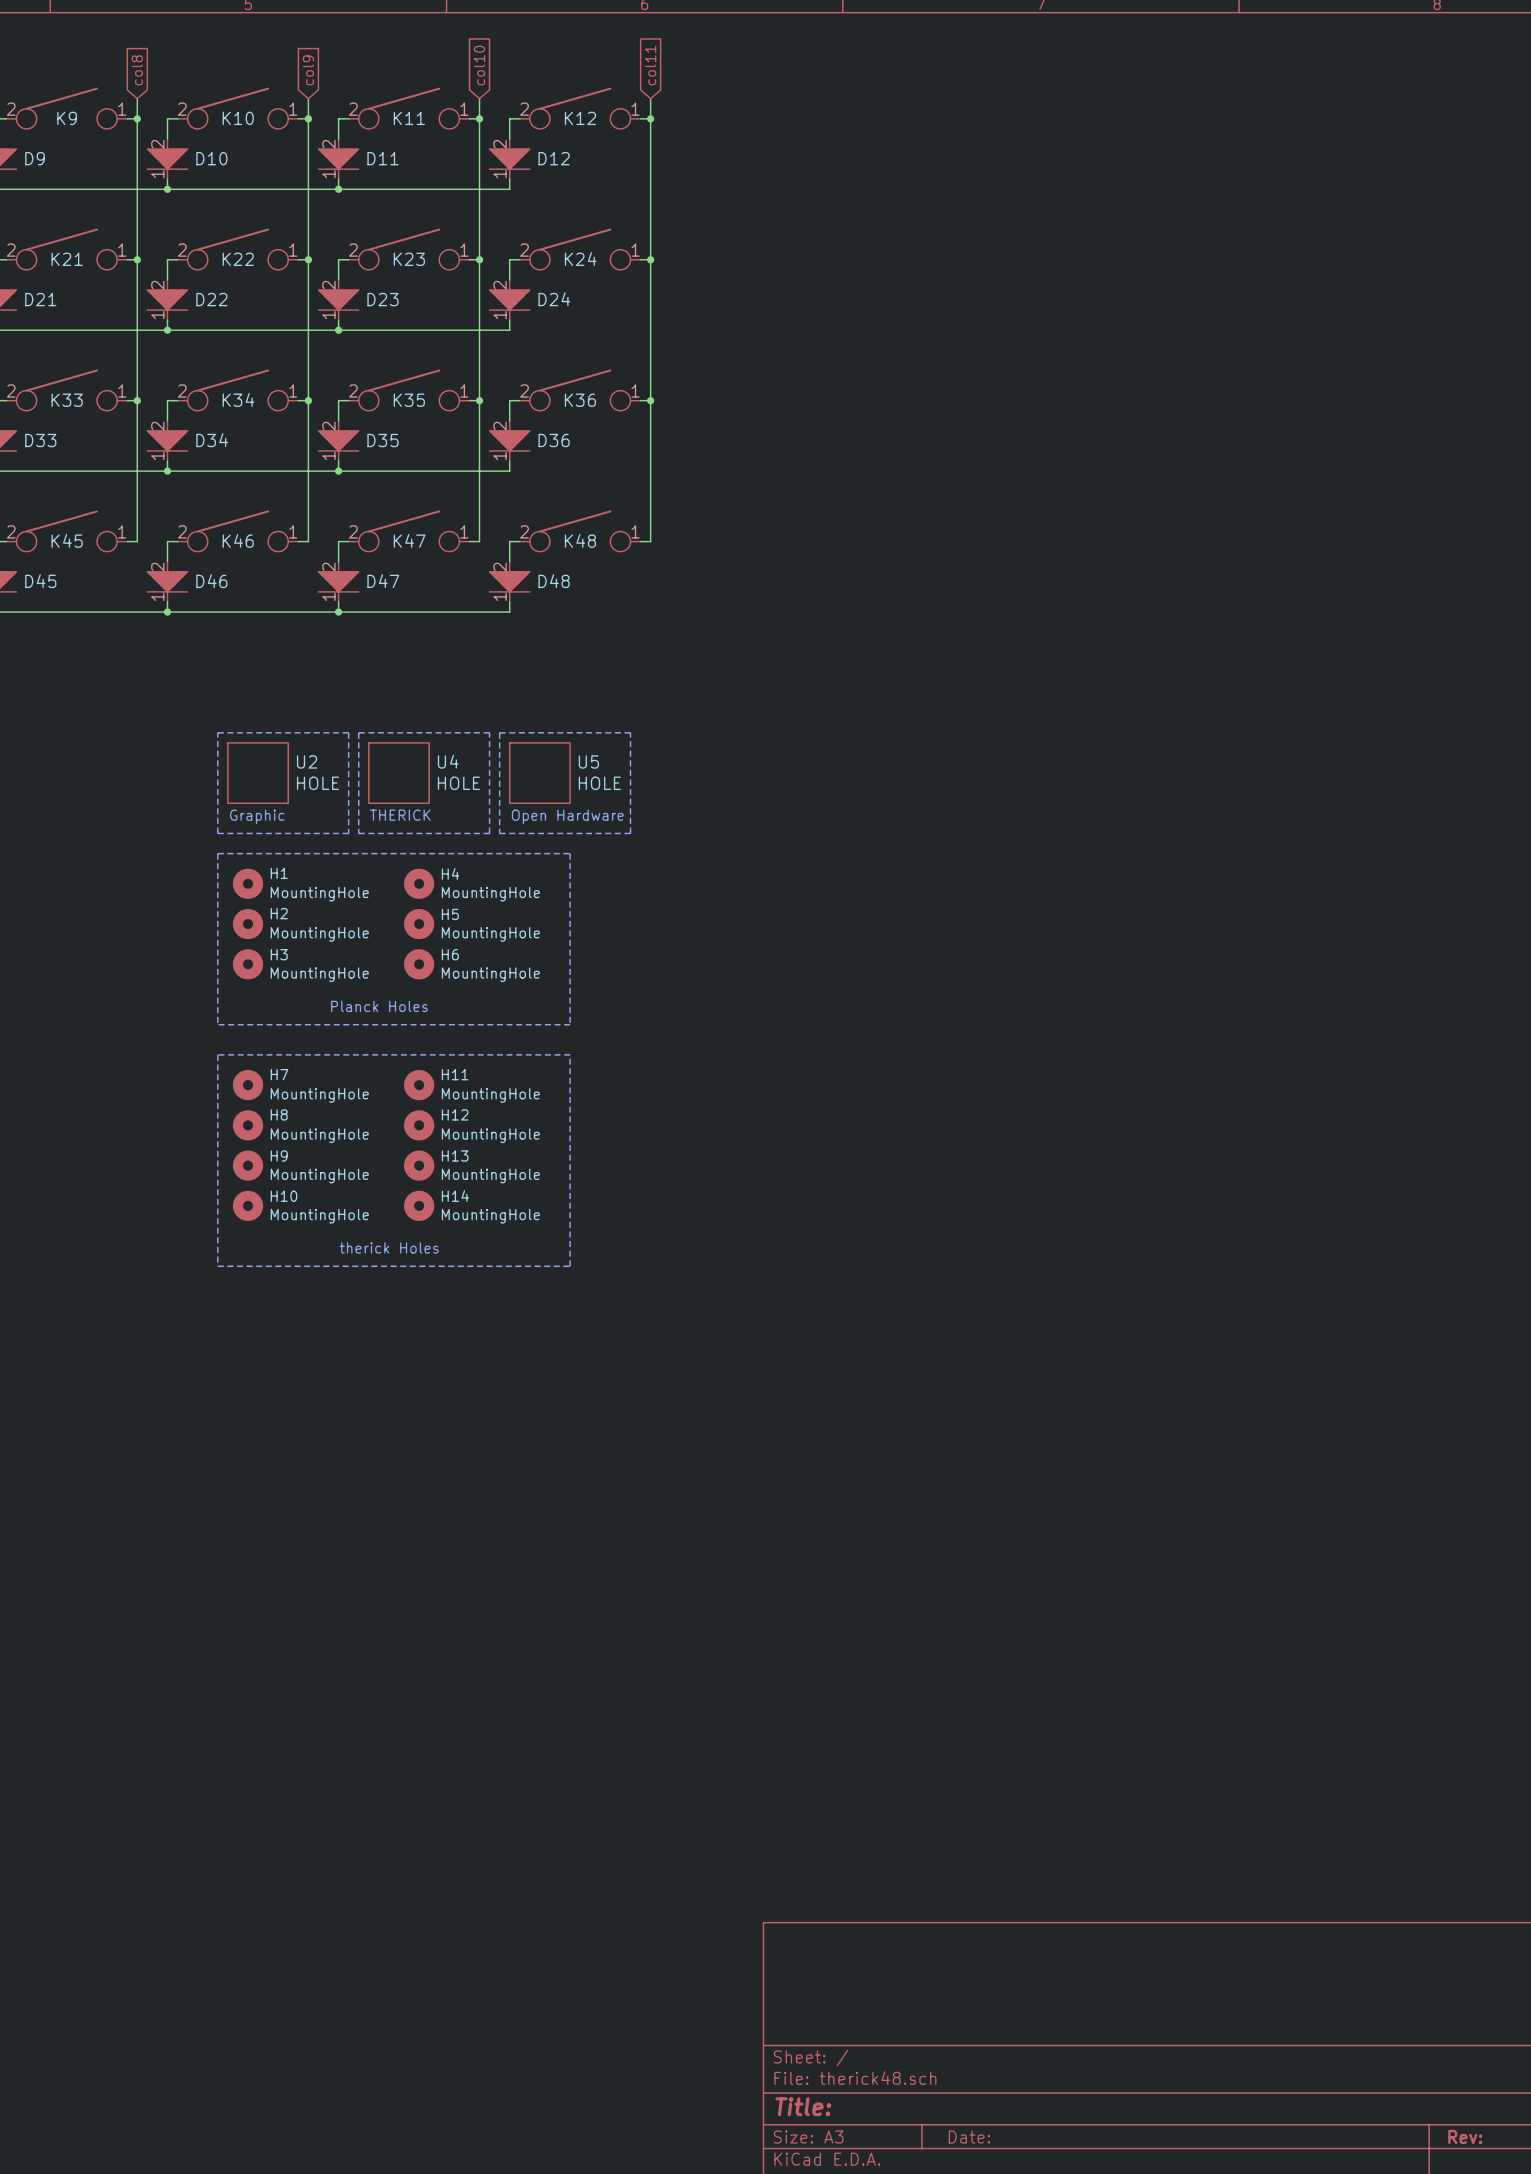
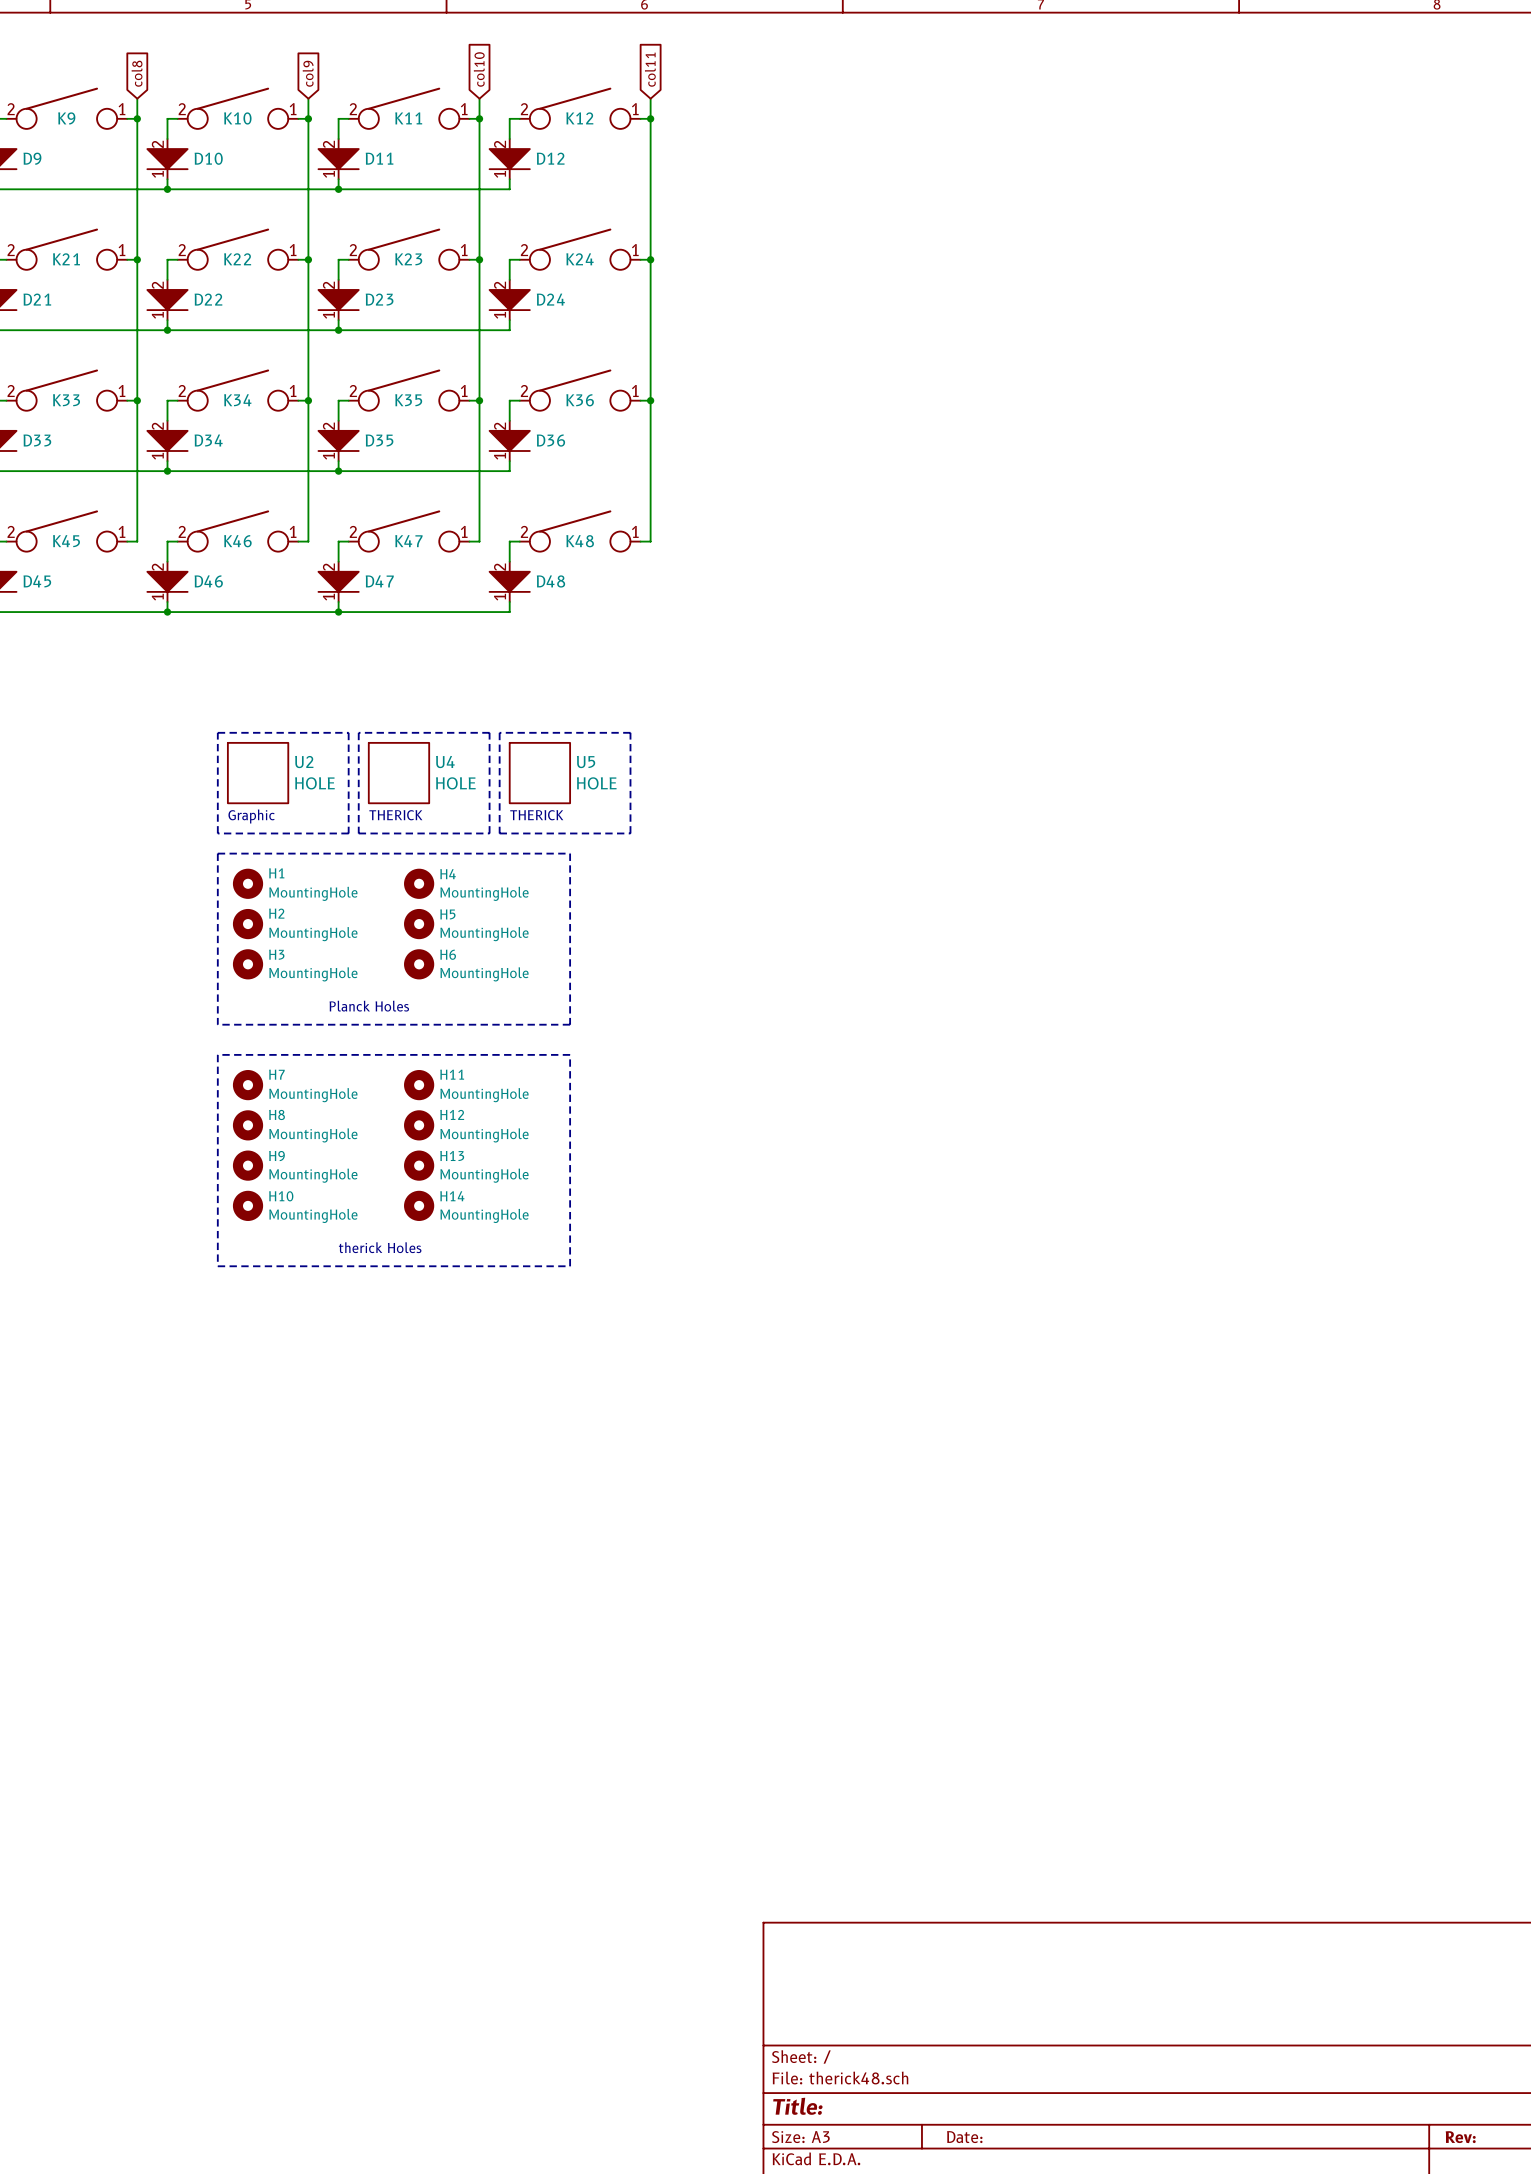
text: Open Hardware (567, 816) -> THERICK (536, 815)

